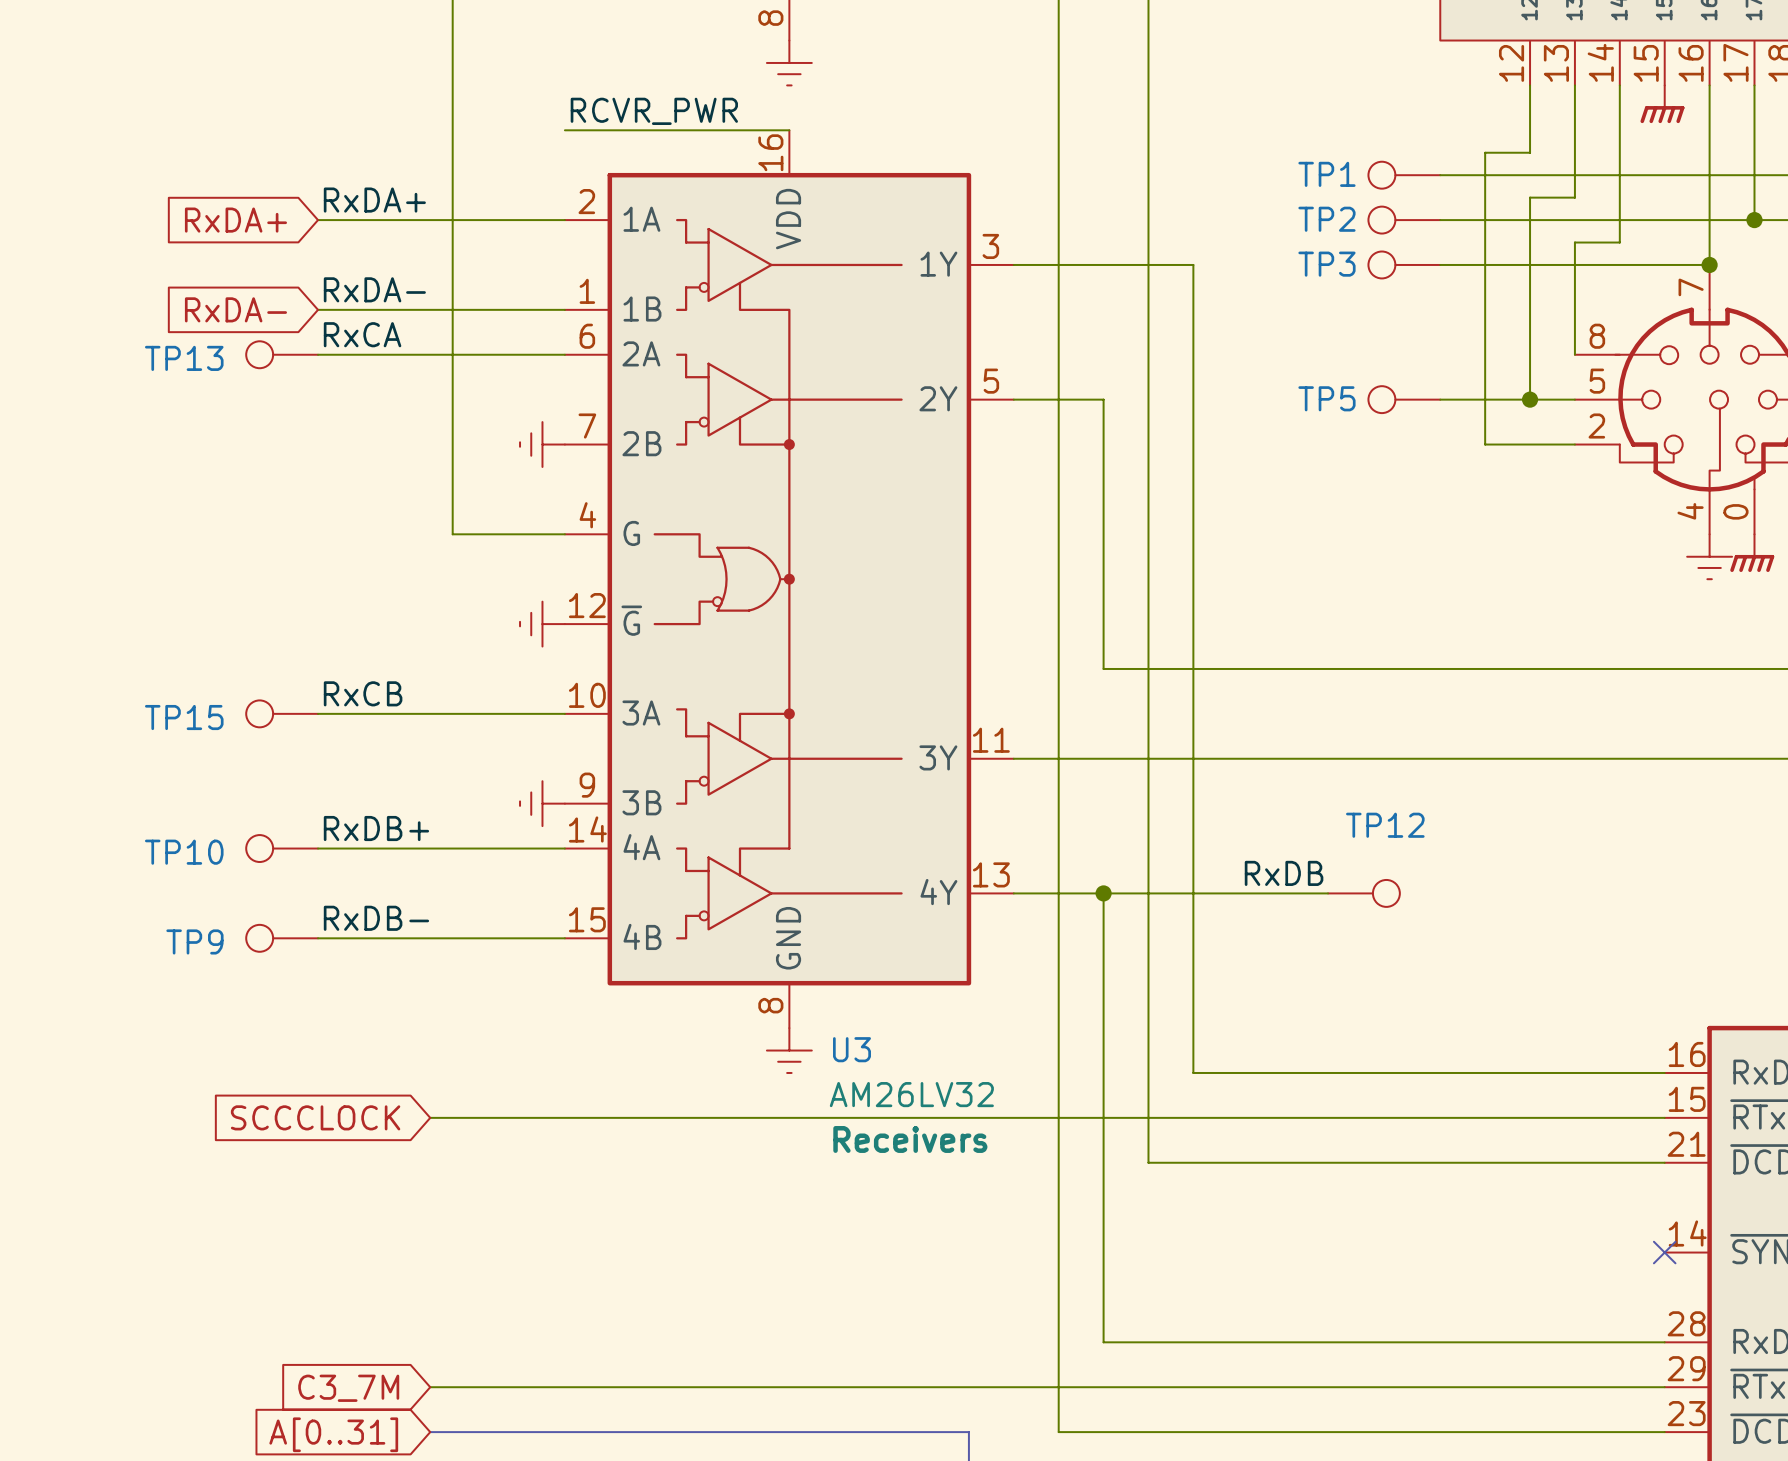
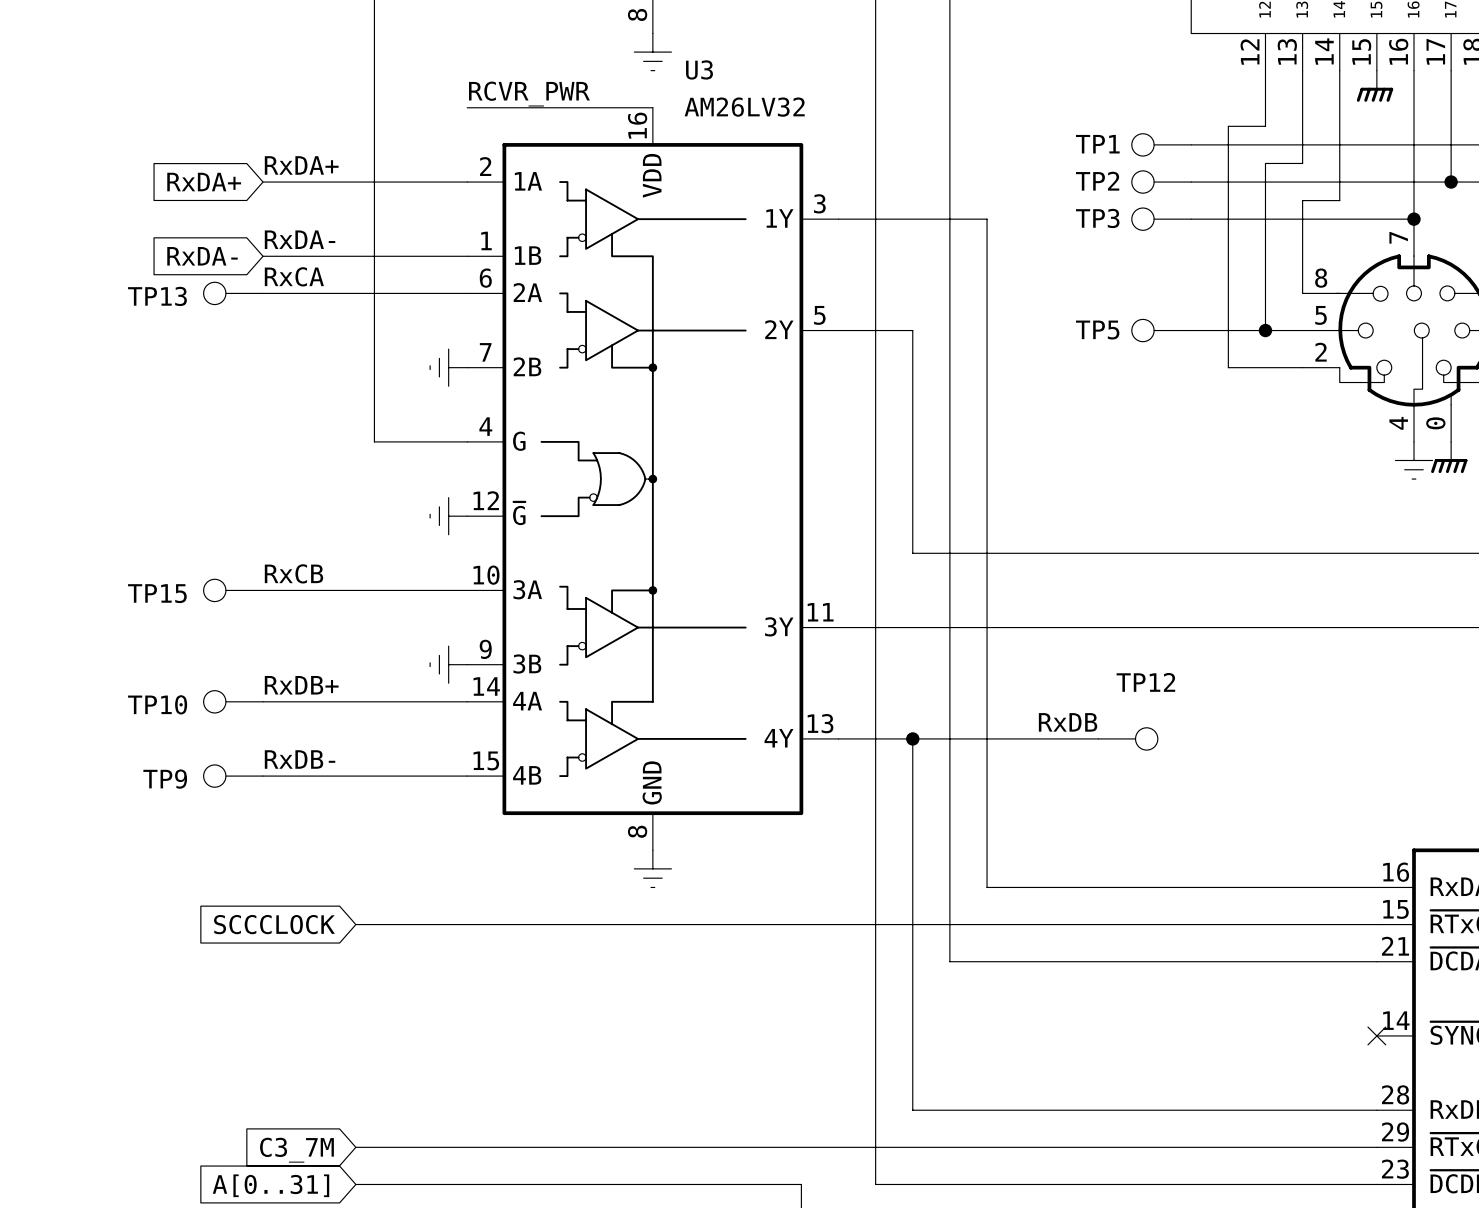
U3 name position: U3 (852, 1049) -> U3 (699, 69)
U3 value position: AM26LV32 (911, 1094) -> AM26LV32 (744, 107)
U3 text: Receivers (910, 1139) -> none

